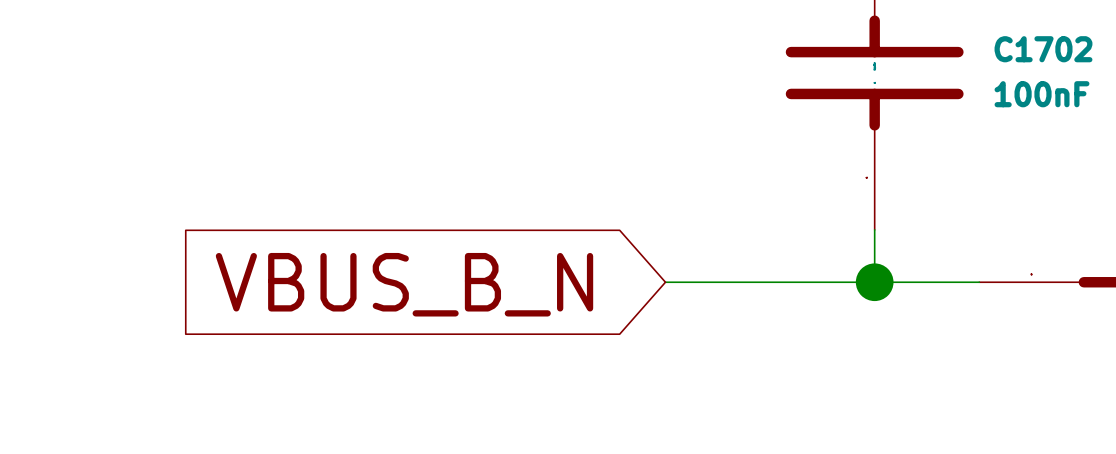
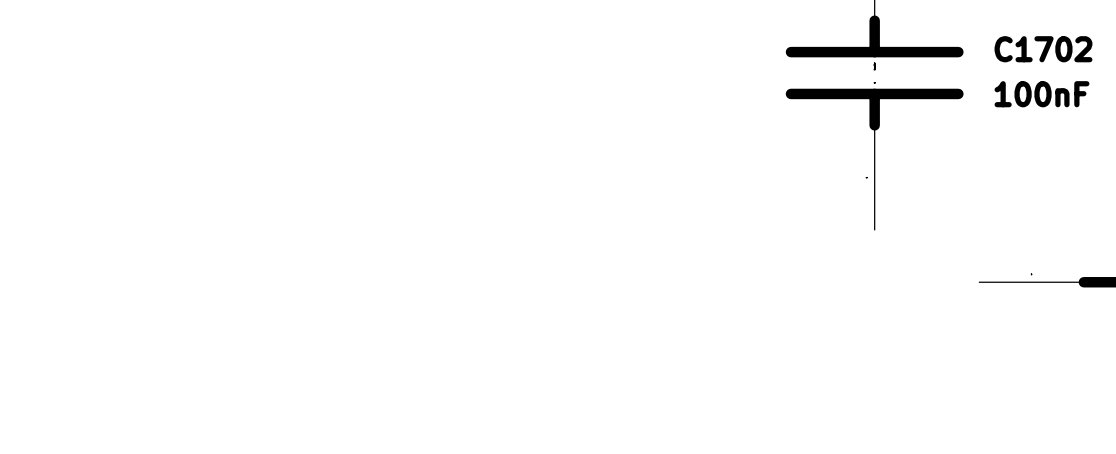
wire: (874, 229) (874, 282) -> none
wire: (665, 282) (979, 282) -> none
junction: (874, 282) -> none
global label: VBUS_B_N (404, 284) -> none

